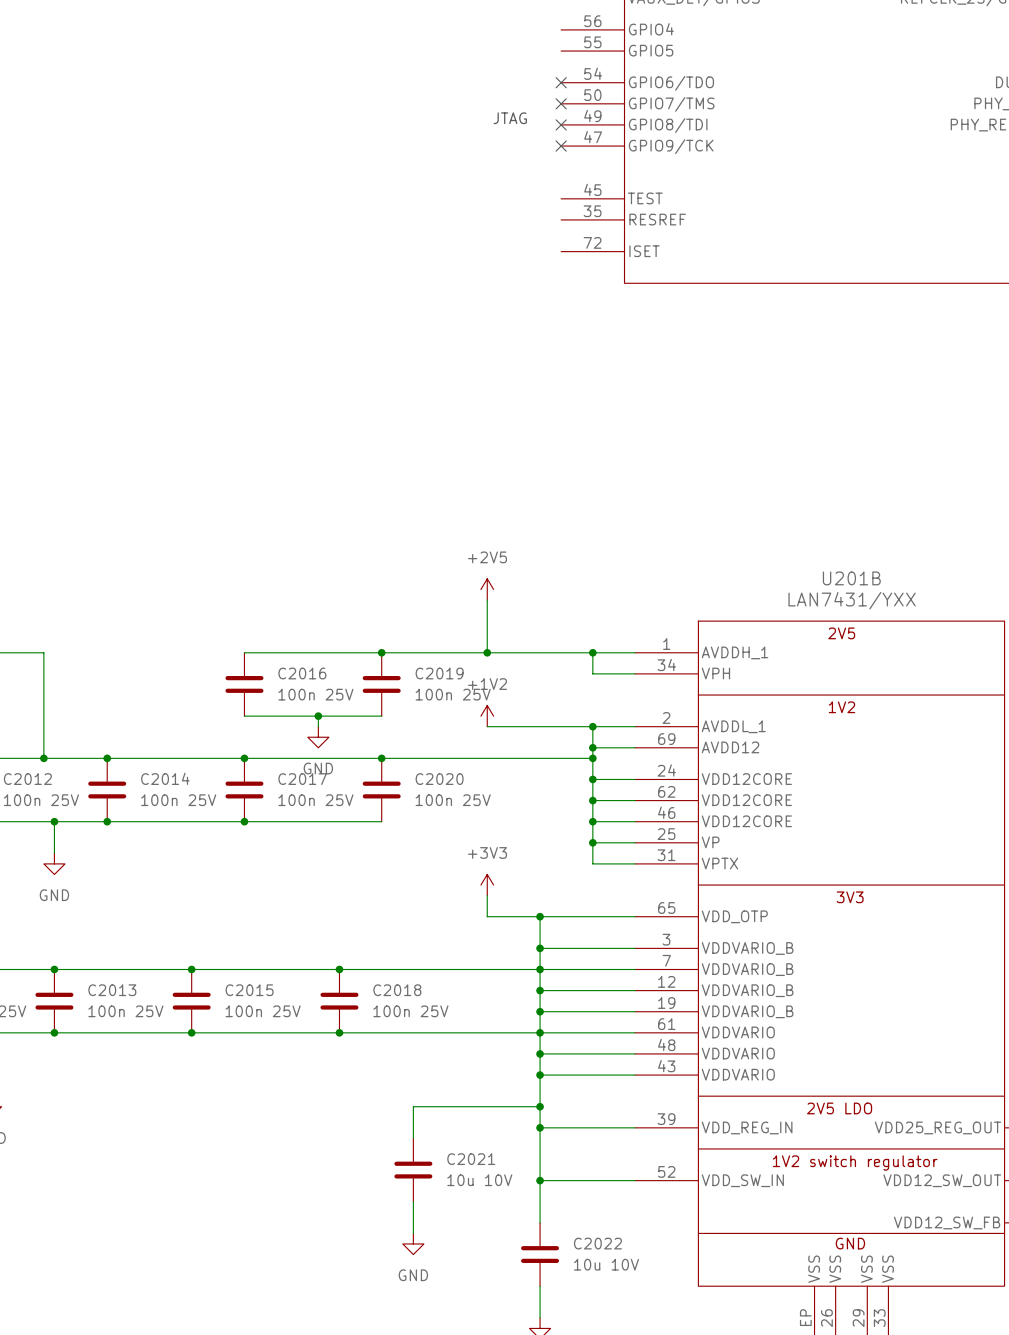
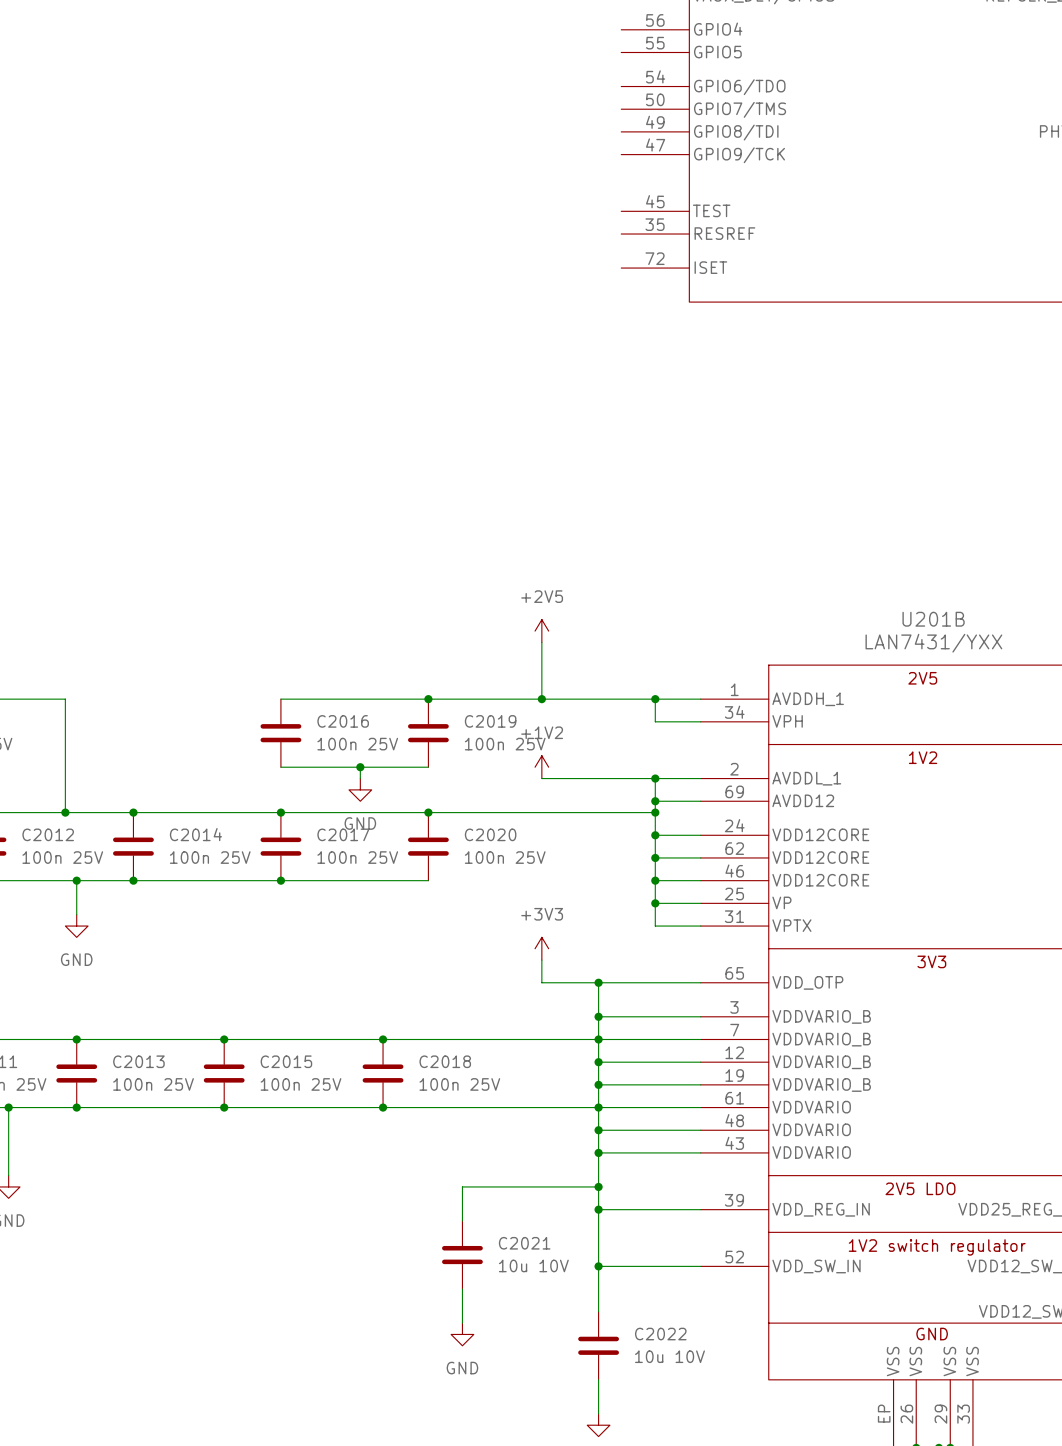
no-connect mark: (561, 82) -> none
no-connect mark: (561, 103) -> none
text: JTAG (510, 118) -> none
no-connect mark: (561, 124) -> none
no-connect mark: (561, 146) -> none

